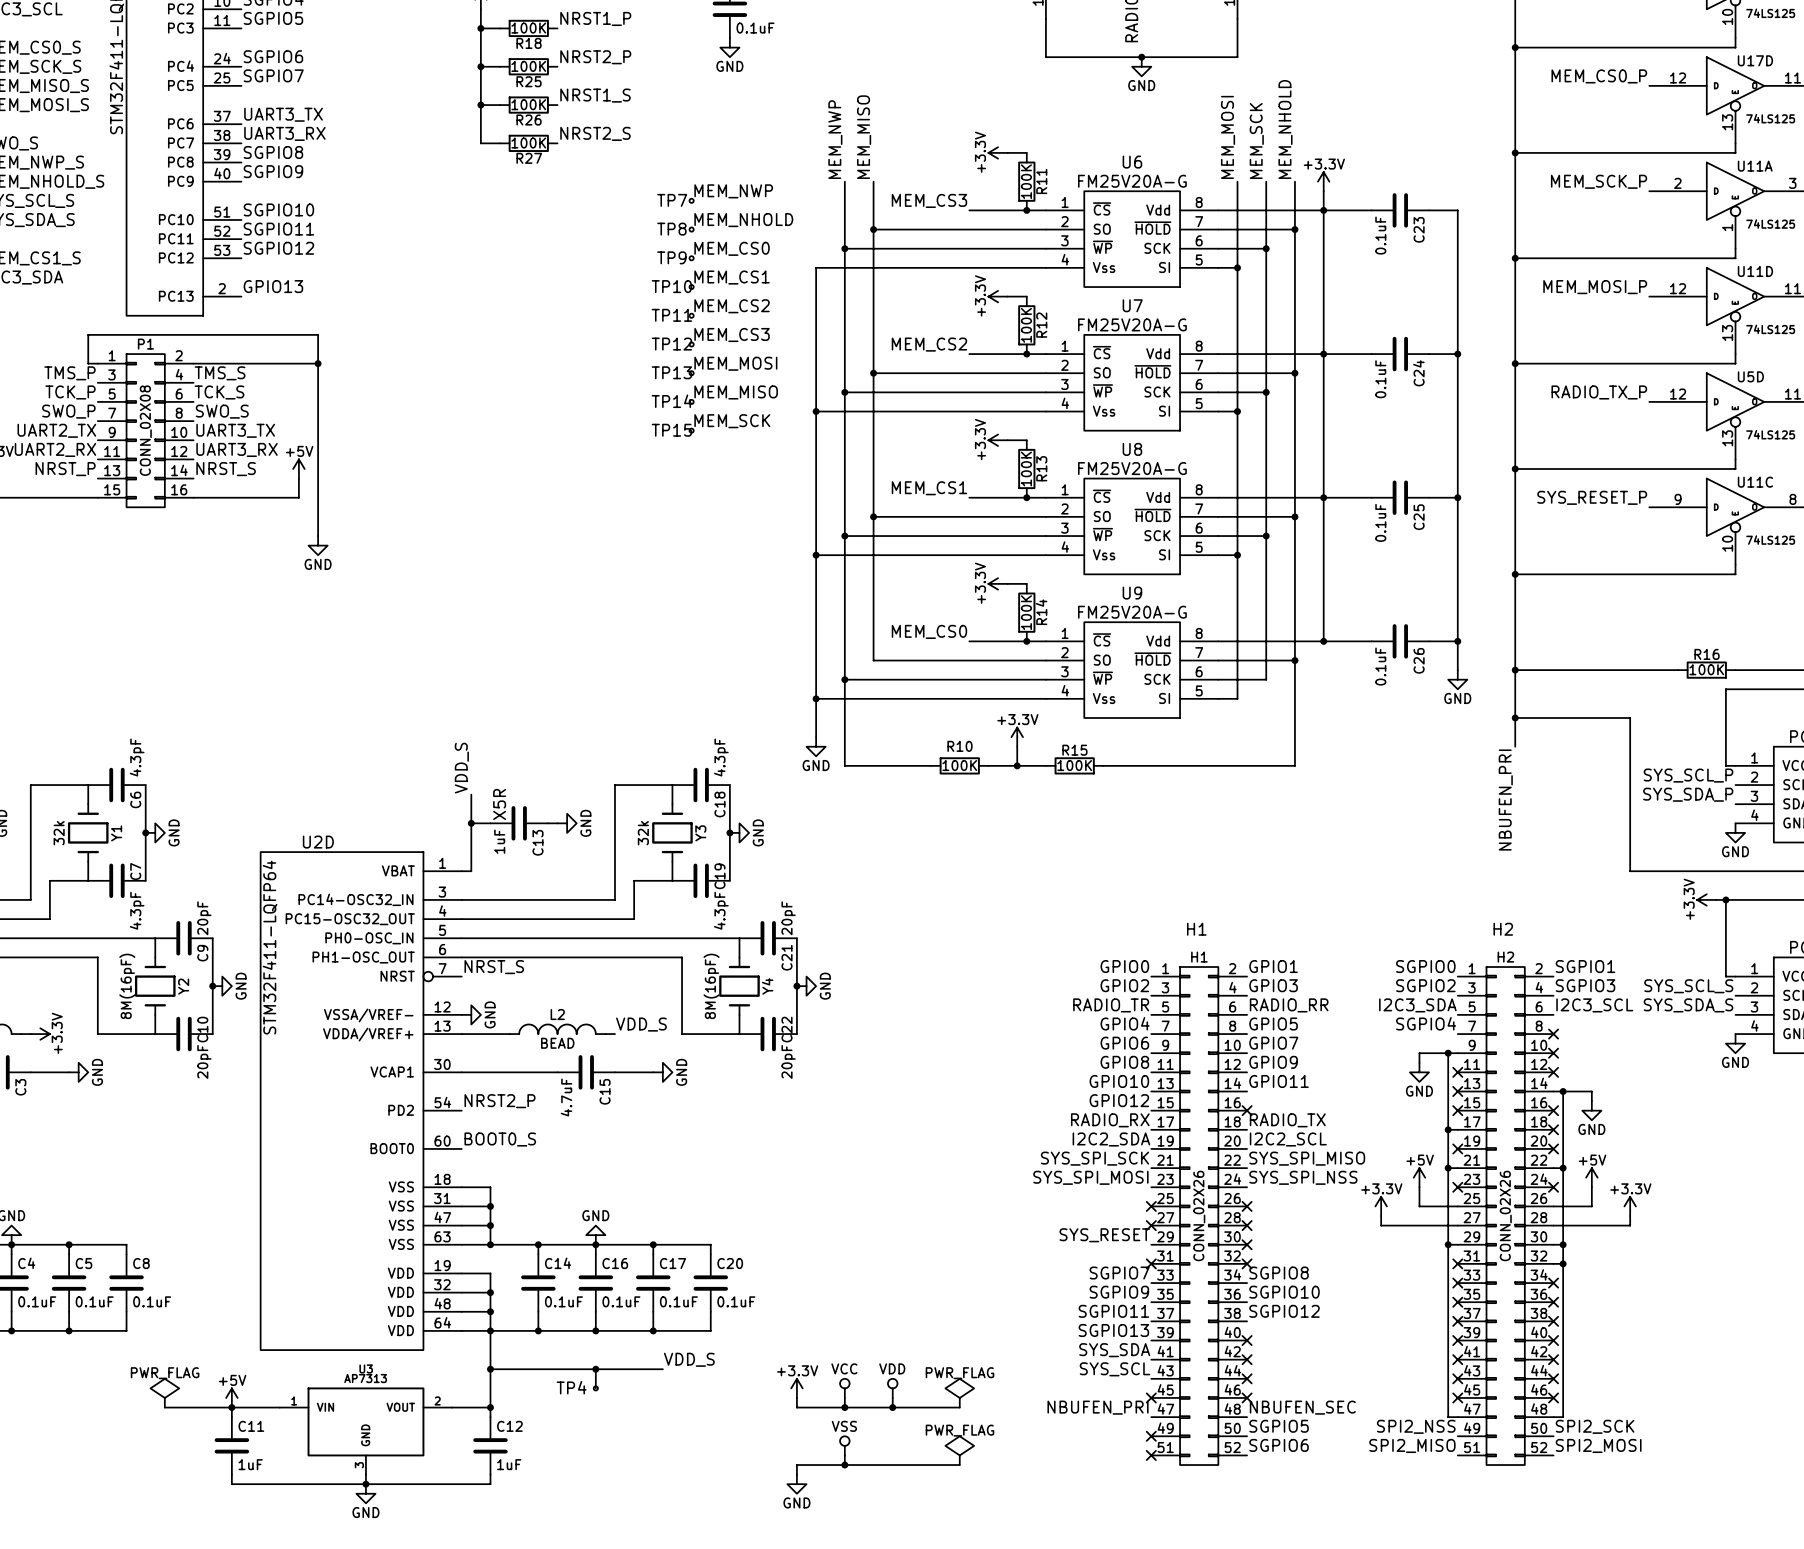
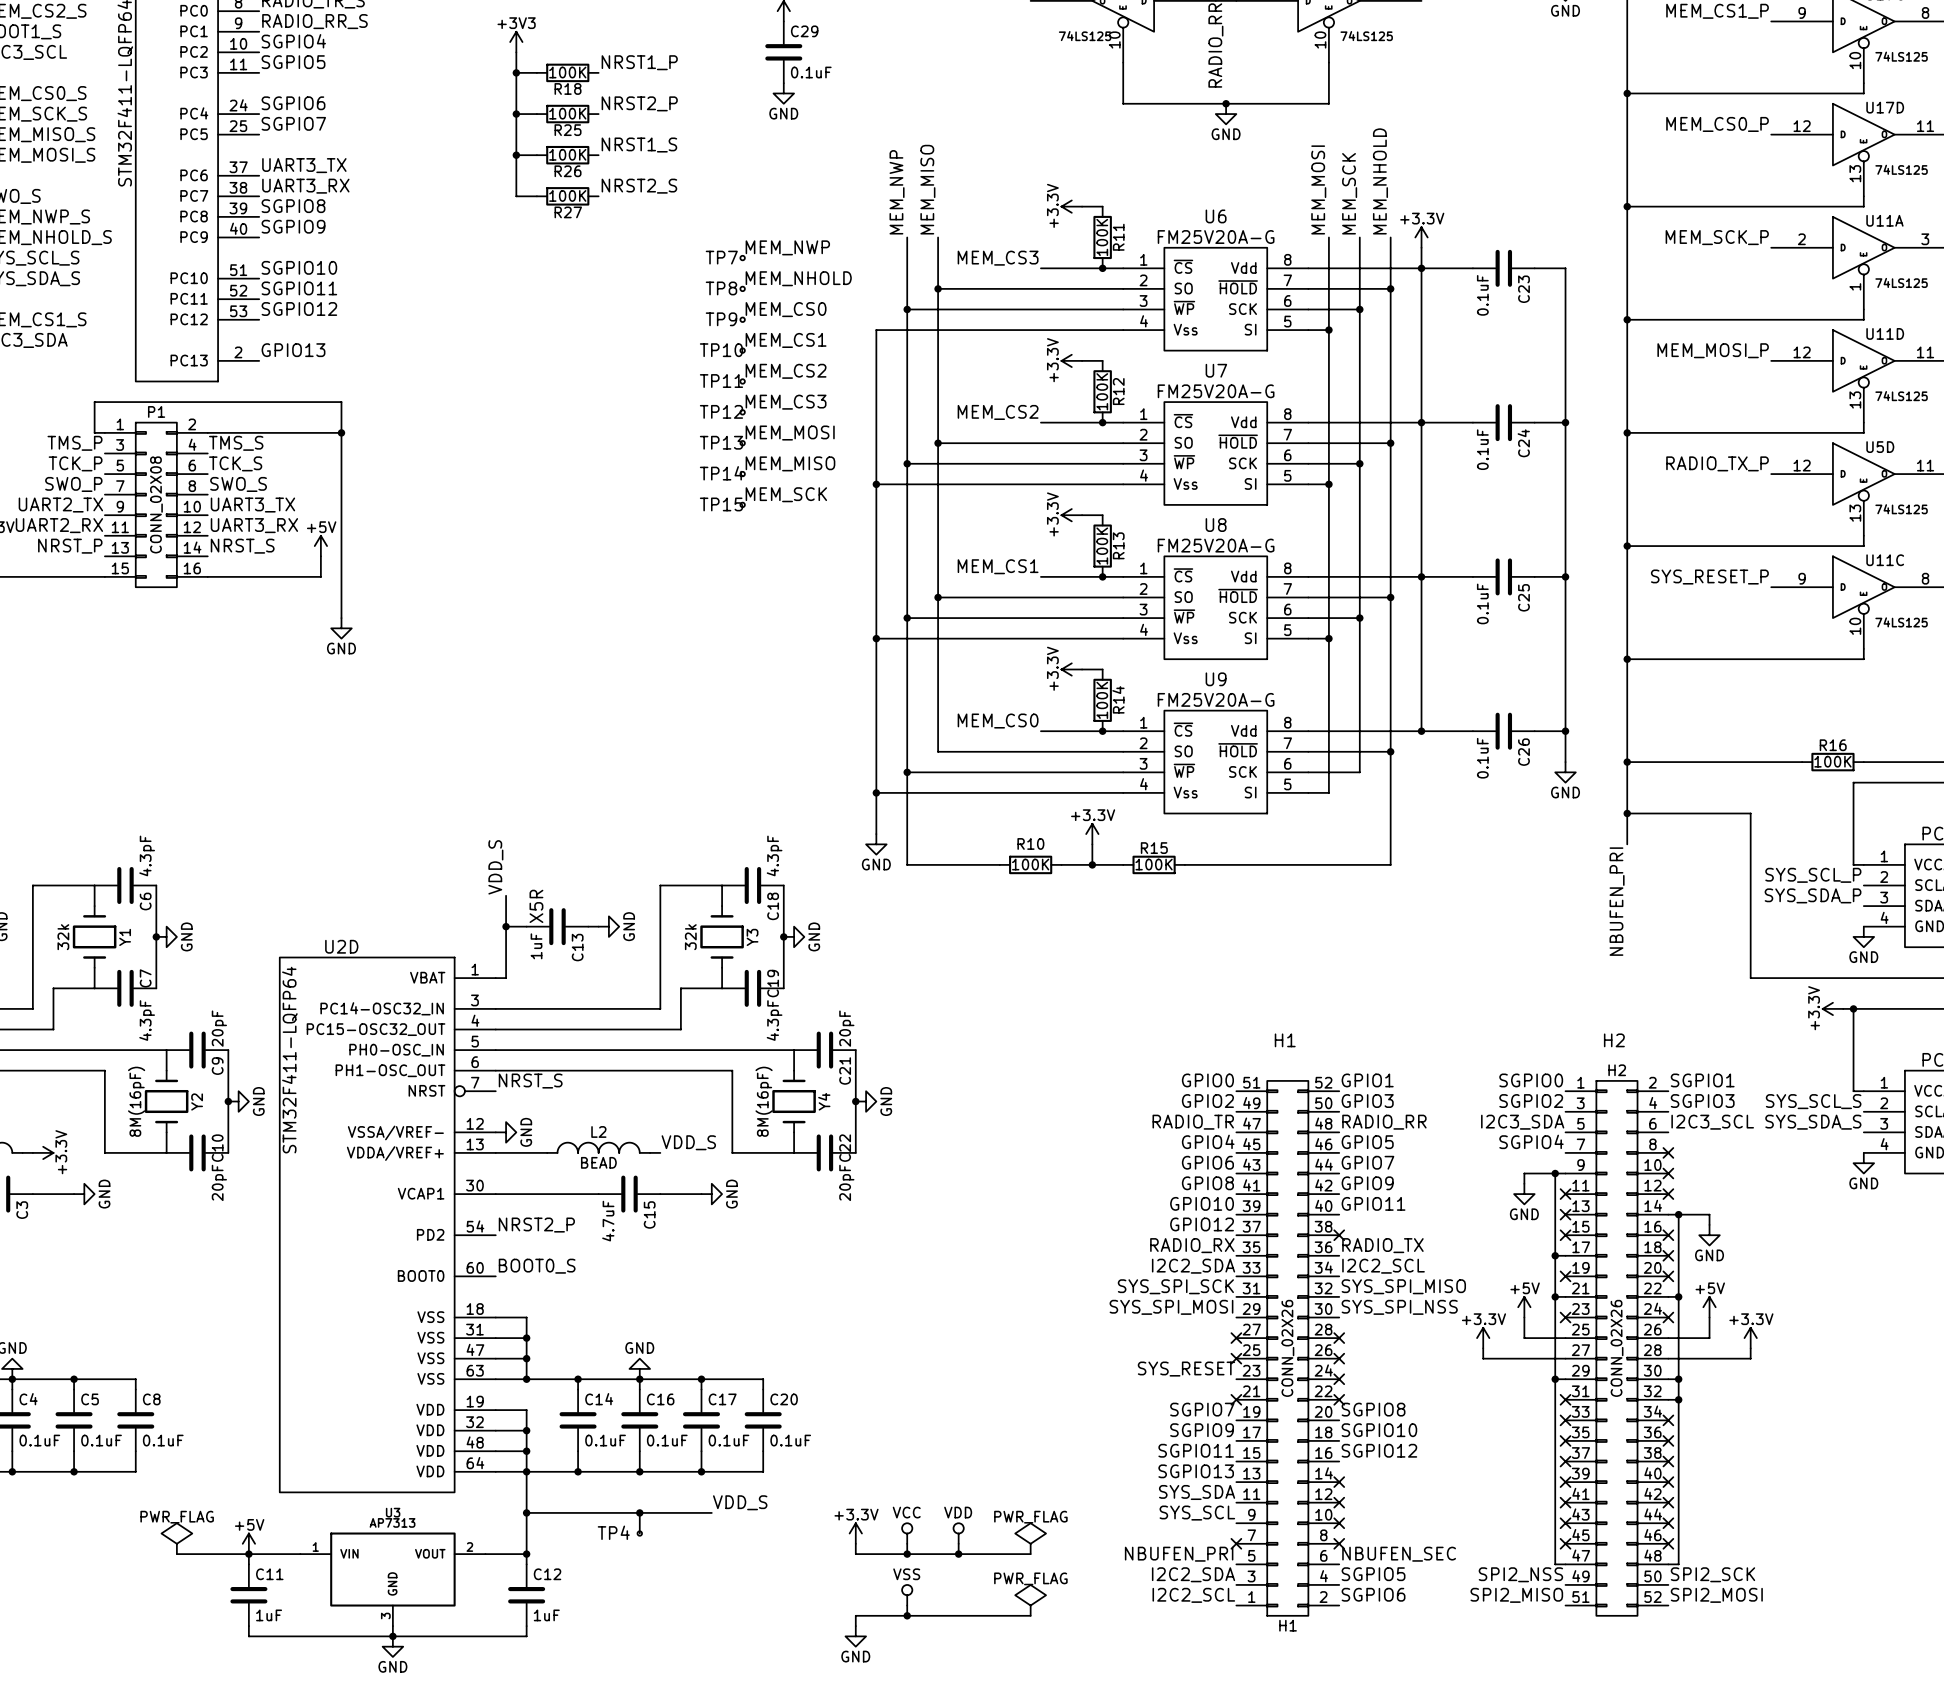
H1 flip: as is (1199, 1216) -> up-down (1287, 1348)
label: none -> I2C2_SDA (1193, 1574)
no-connect mark: (1151, 1436) -> none
label: none -> I2C2_SCL (1193, 1595)
no-connect mark: (1151, 1455) -> none

